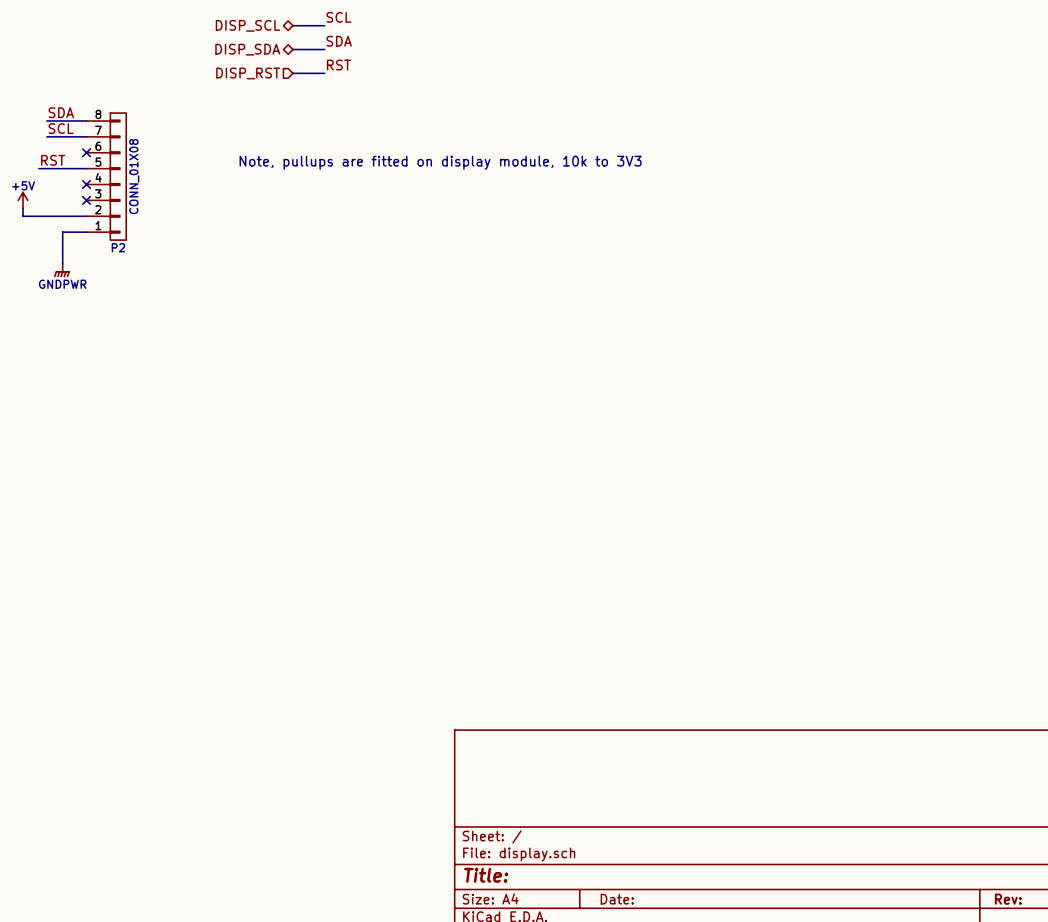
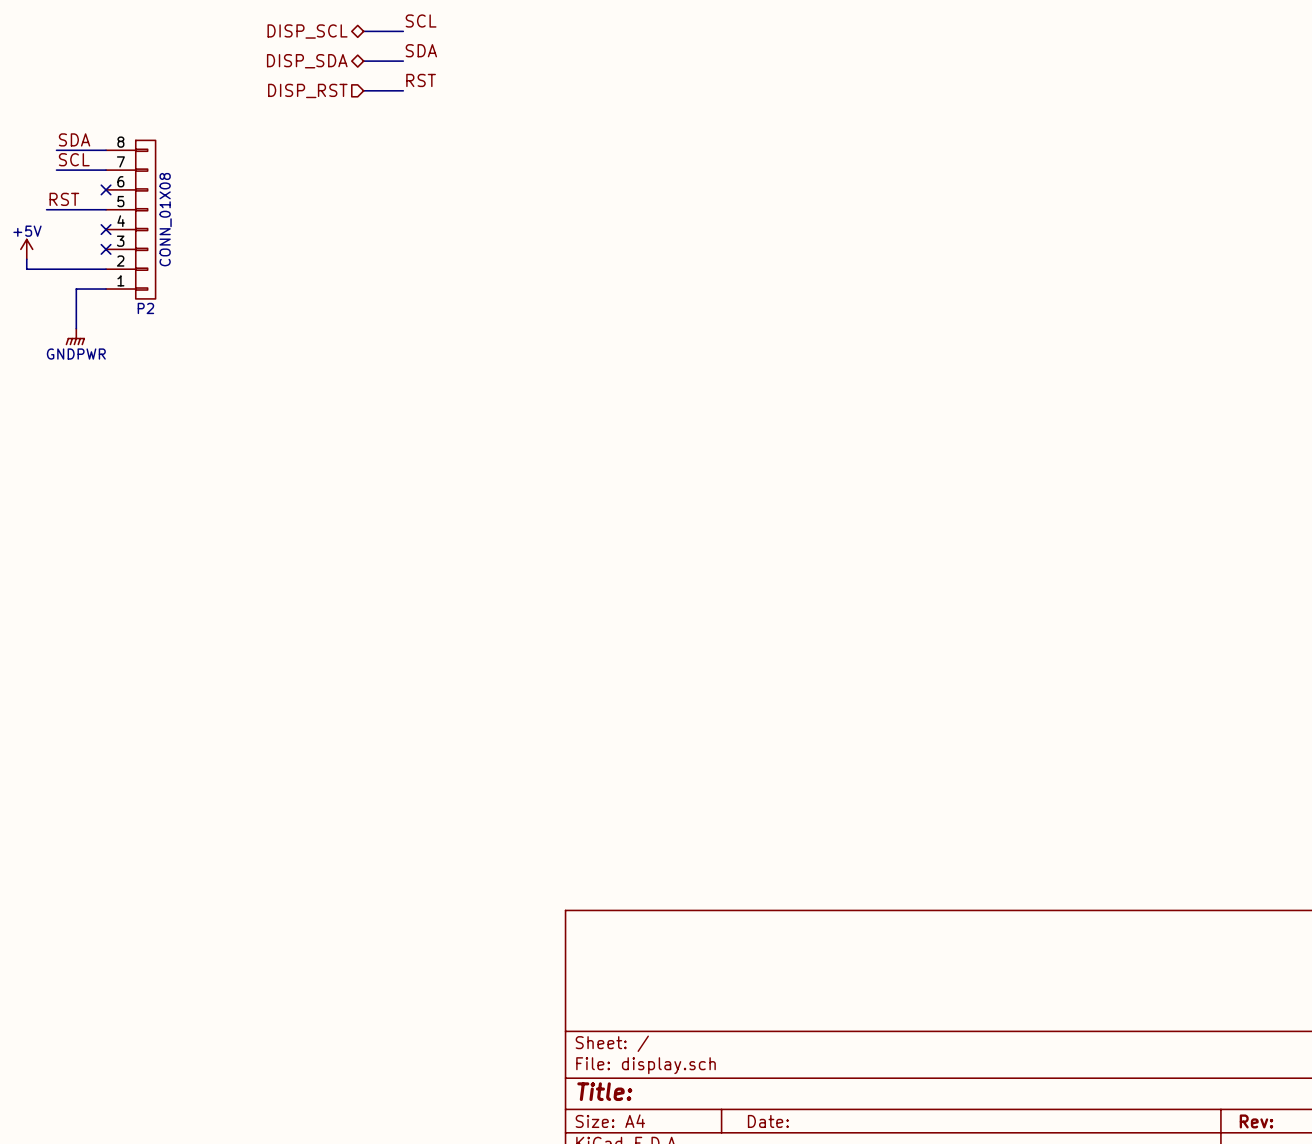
text: Note, pullups are fitted on display module, 10k to 3V3 (440, 162) -> none

